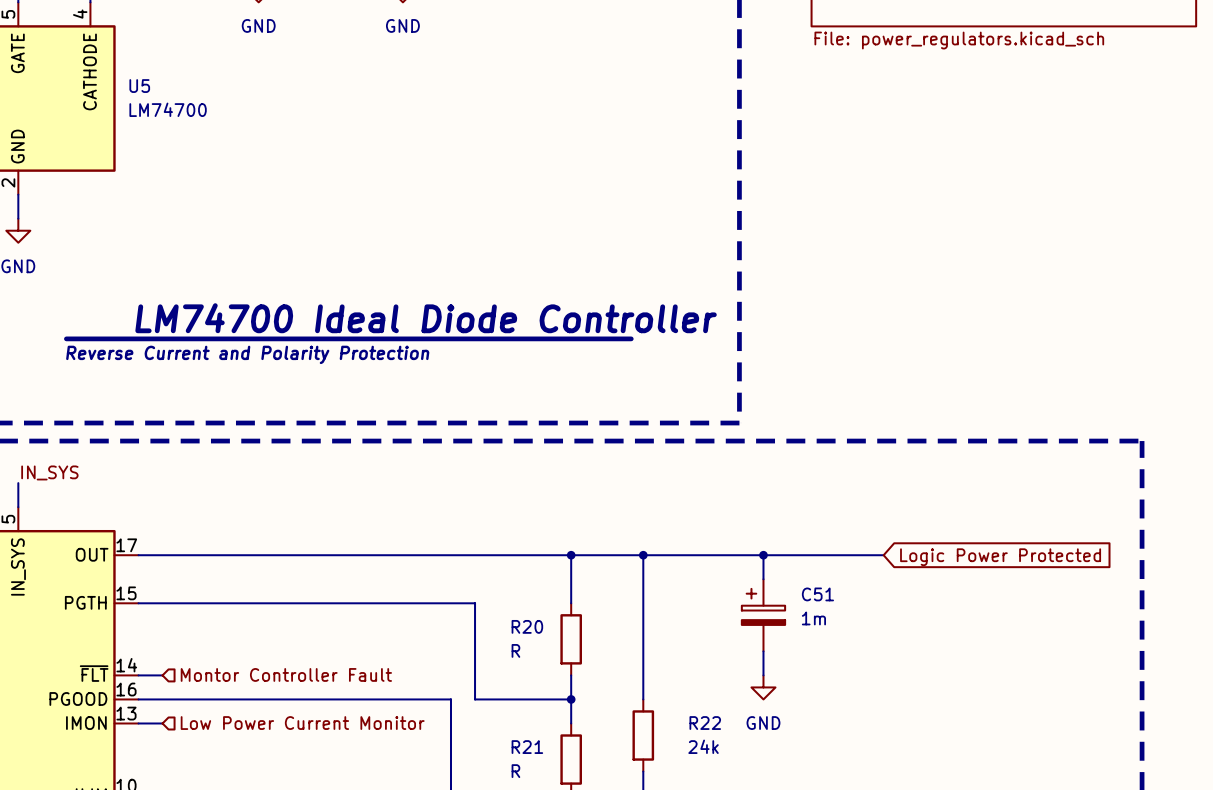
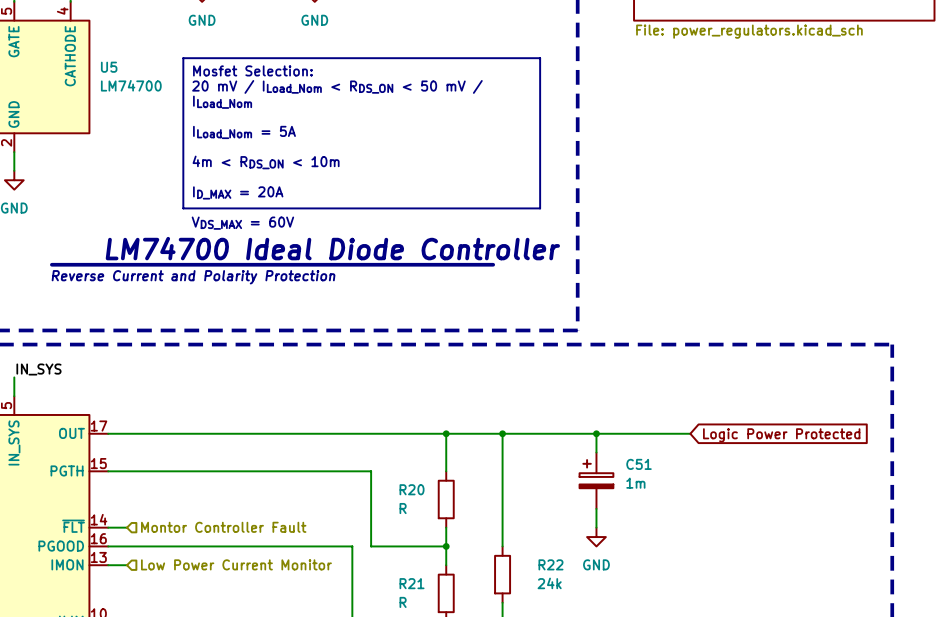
line: none -> (183, 58) (540, 58) (540, 208) (183, 208) (183, 58)
text: none -> Mosfet Selection: (252, 70)
text: none -> 20 mV / ILoad_Nom < RDS_ON < 50 mV / (337, 86)
text: none -> ILoad_Nom (222, 102)
text: none -> ILoad_Nom = 5A (244, 132)
text: none -> 4m < RDS_ON < 10m (266, 162)
text: none -> ID_MAX = 20A (238, 192)
text: none -> VDS_MAX = 60V (242, 223)

